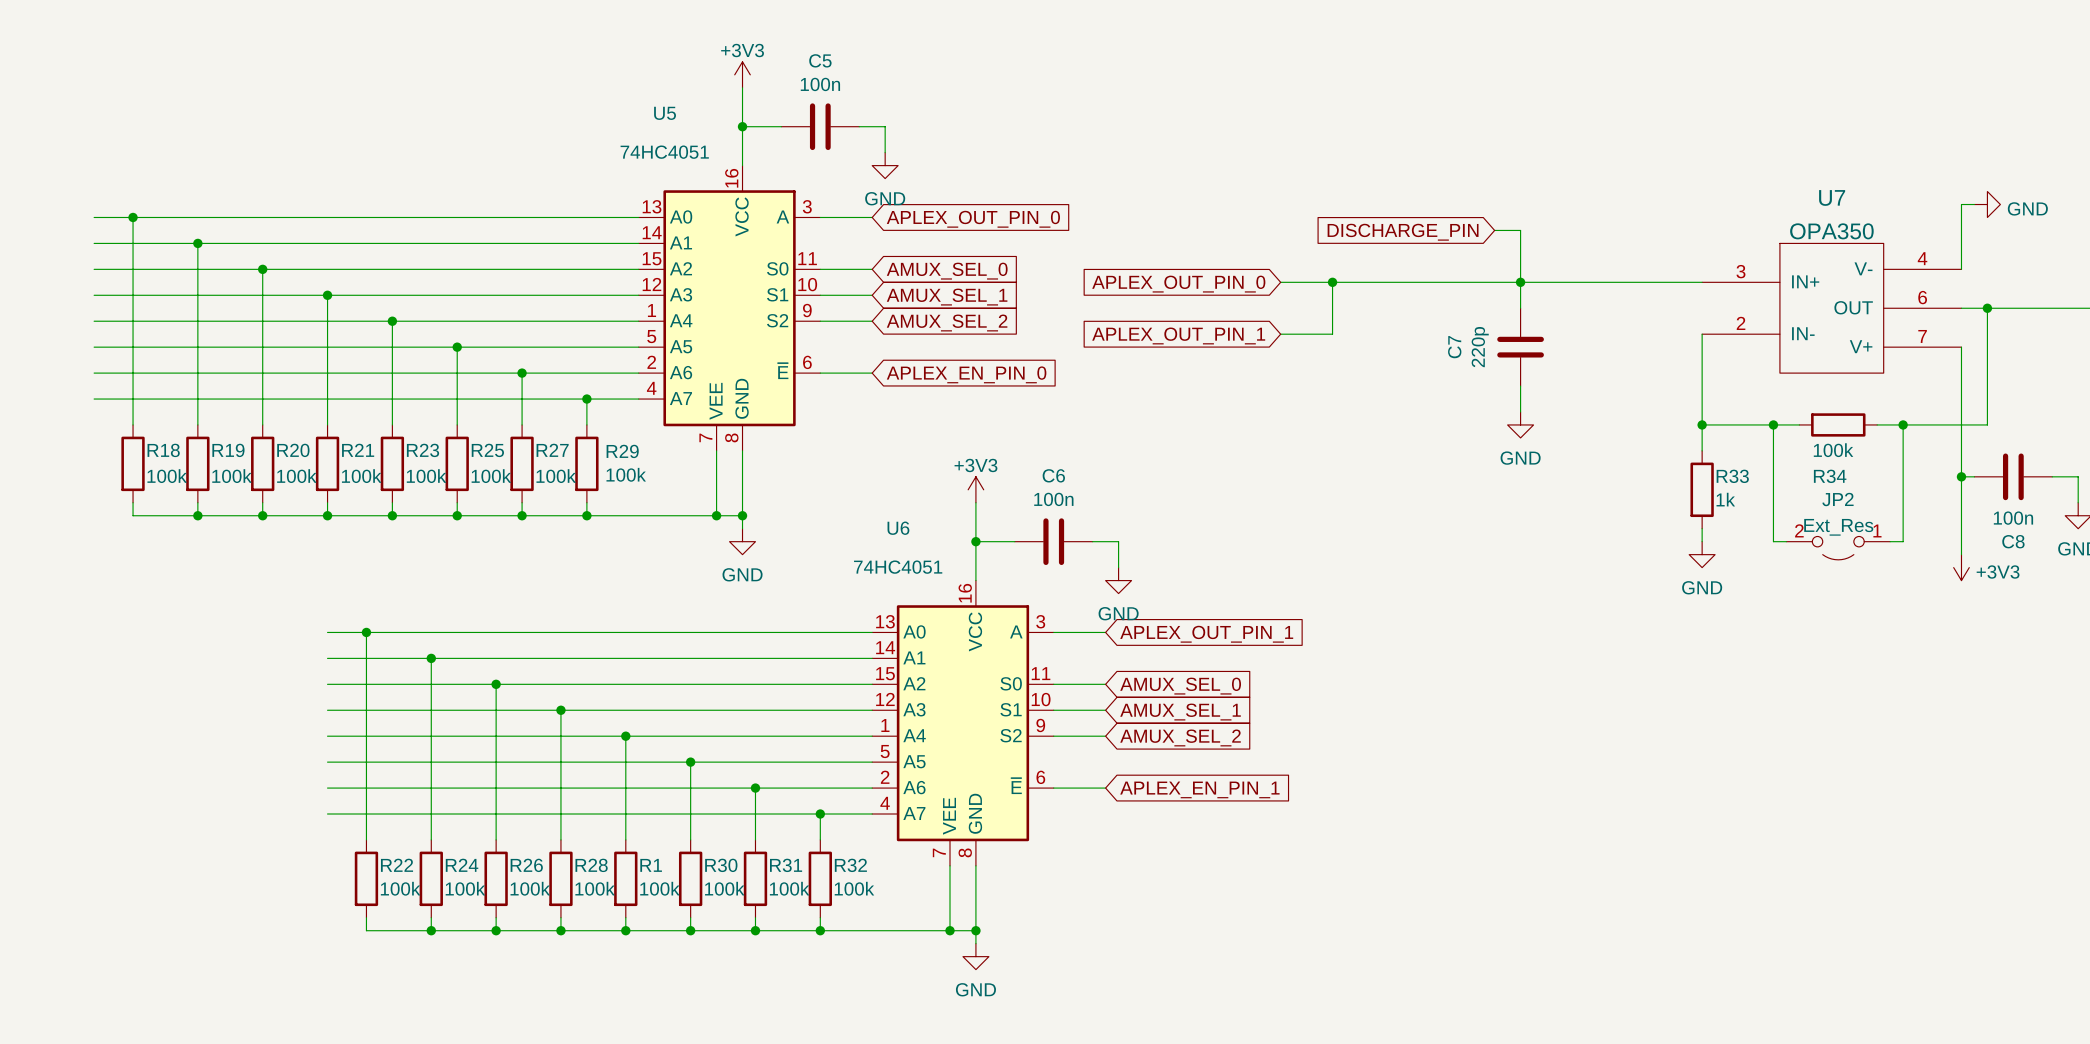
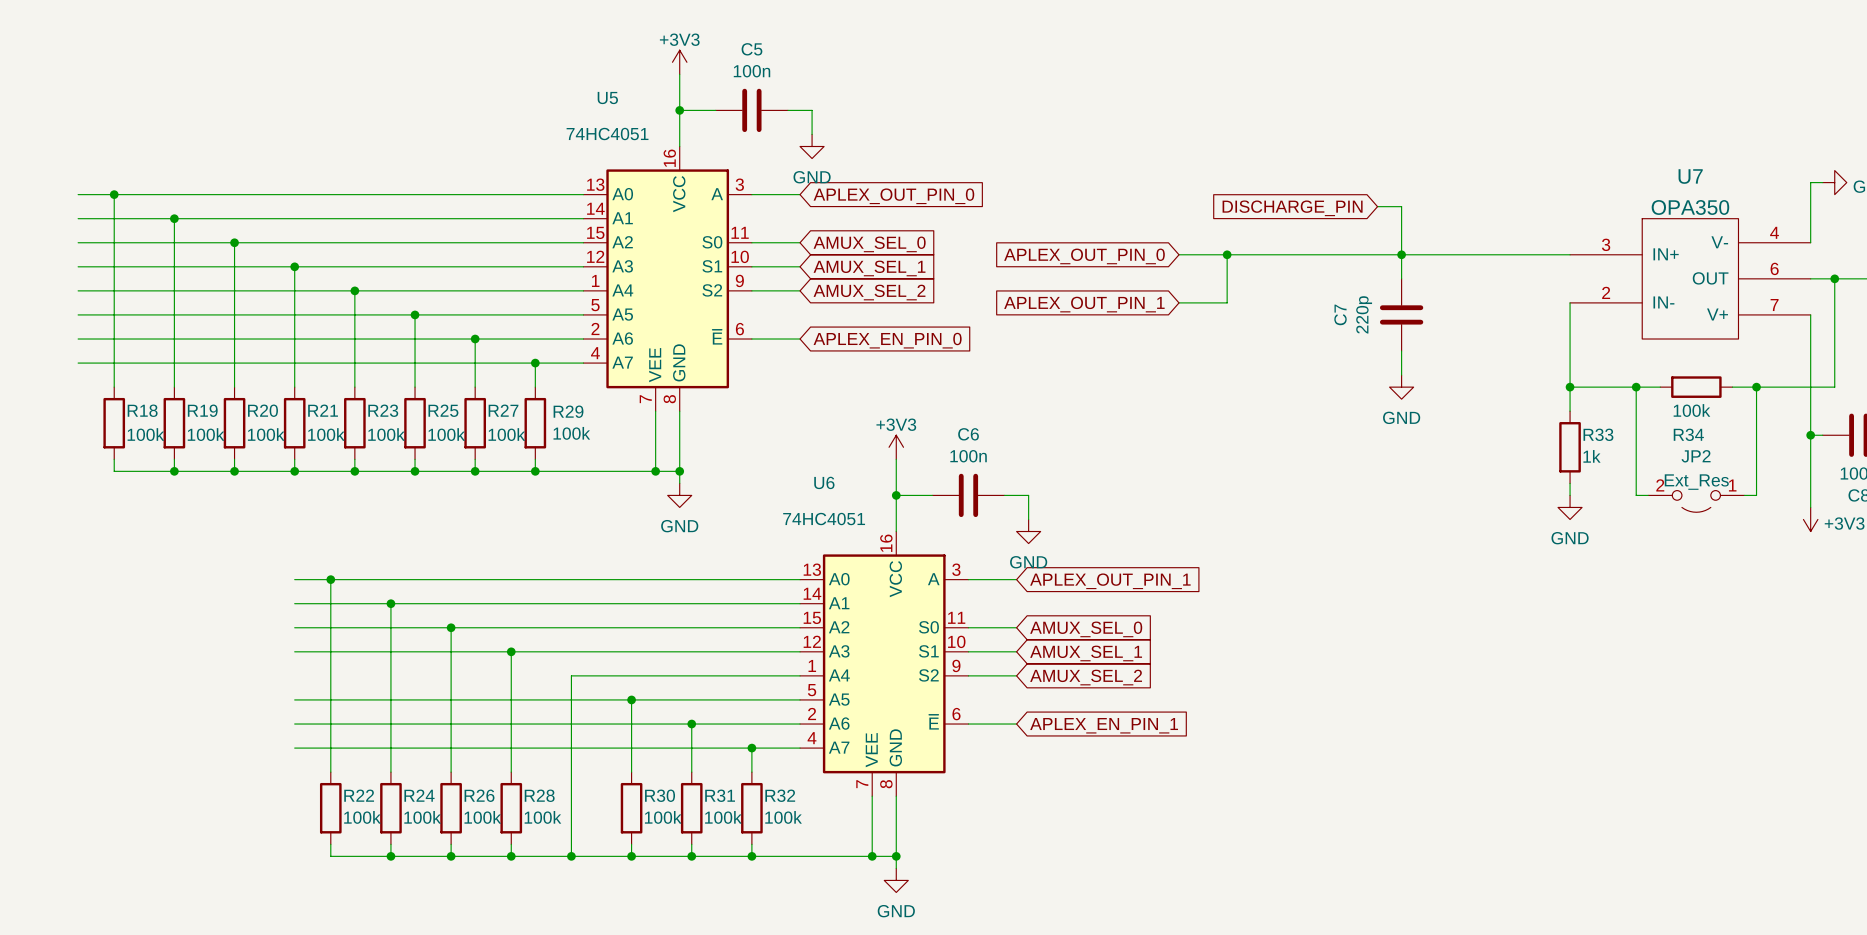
wire: (327, 736) (625, 736) -> none
junction: (625, 736) -> none
wire: none -> (571, 772) (571, 844)
R1: 100k (625, 878) -> none

